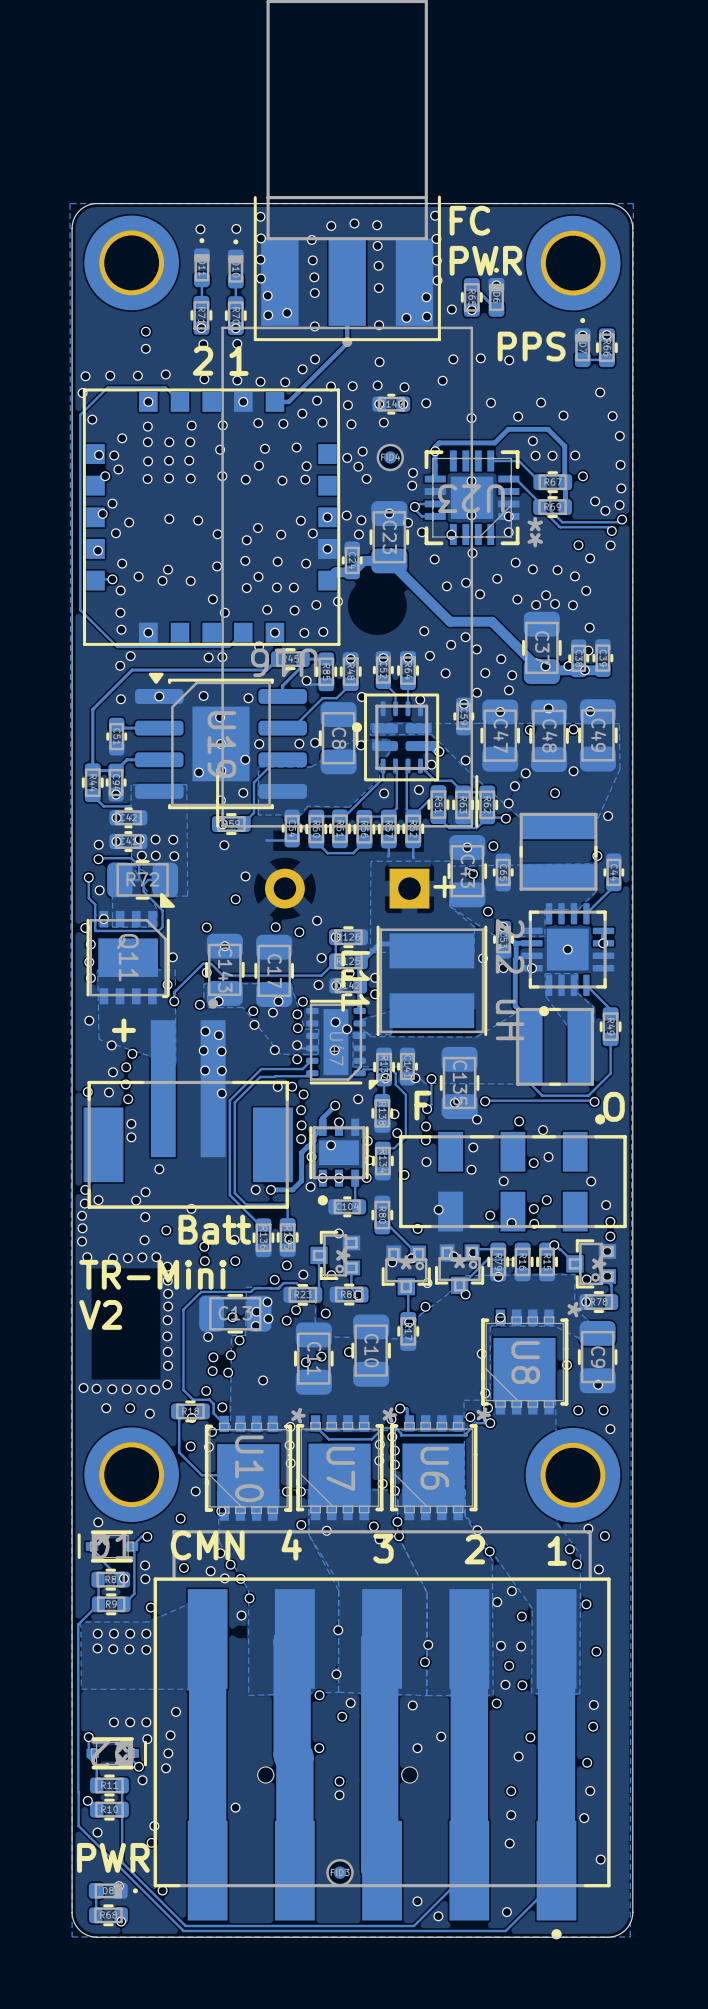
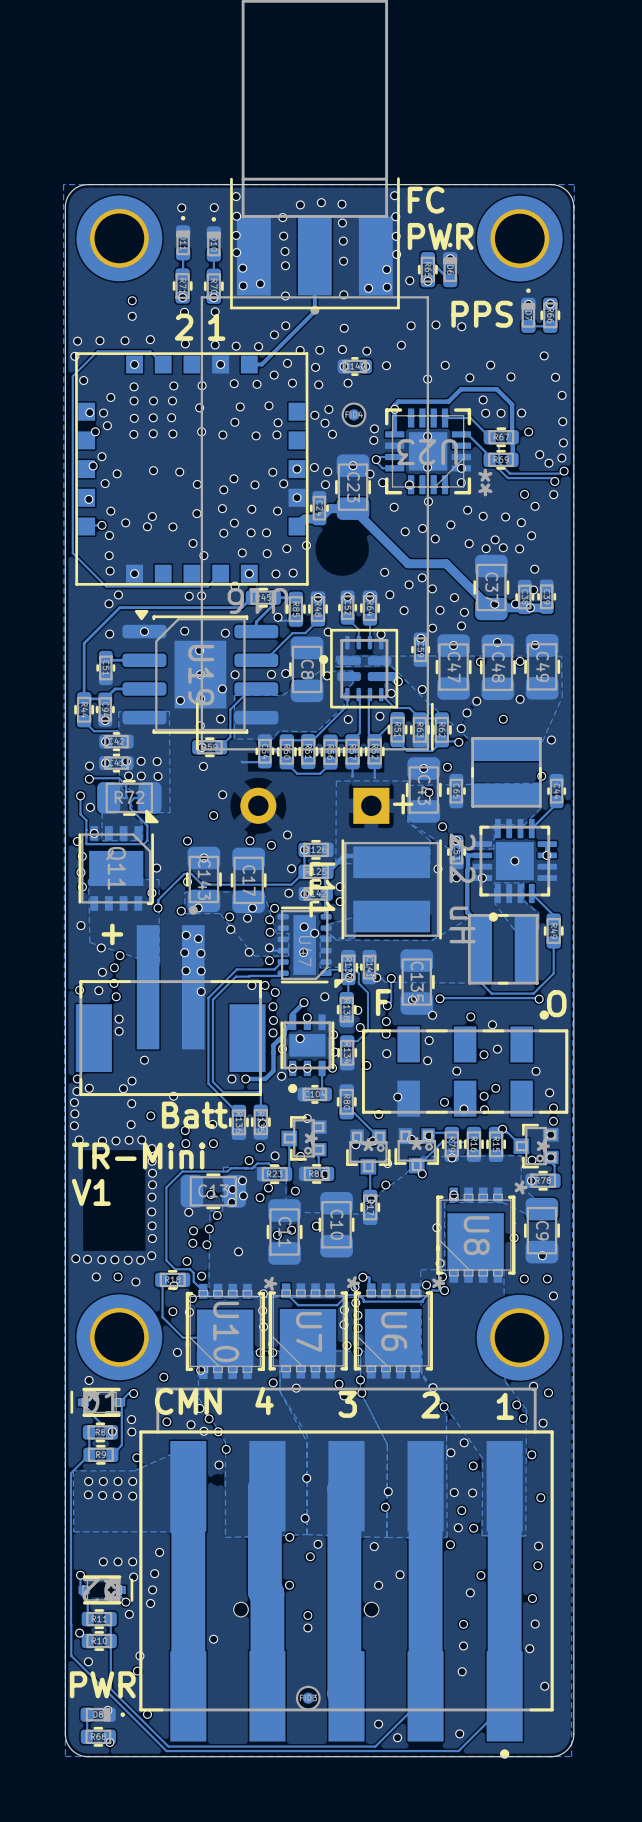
text: V2 (100, 1314) -> V1 (91, 1192)

